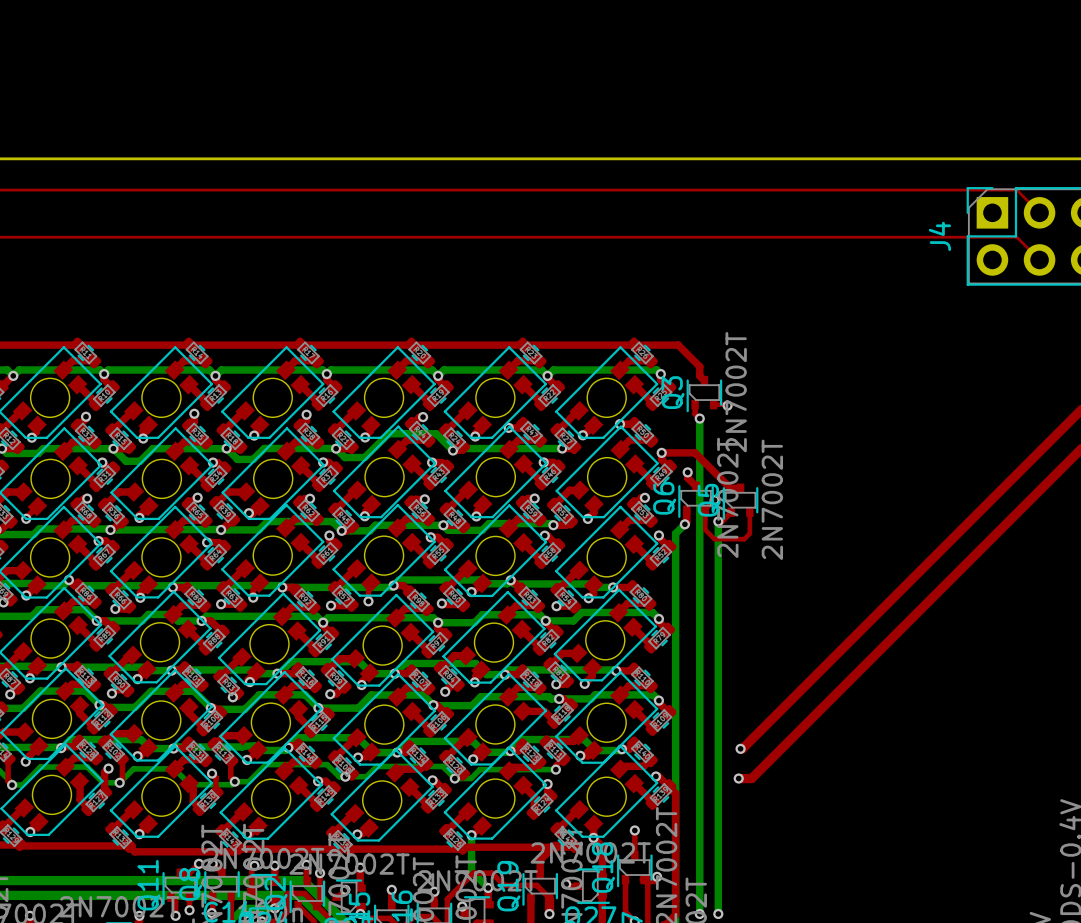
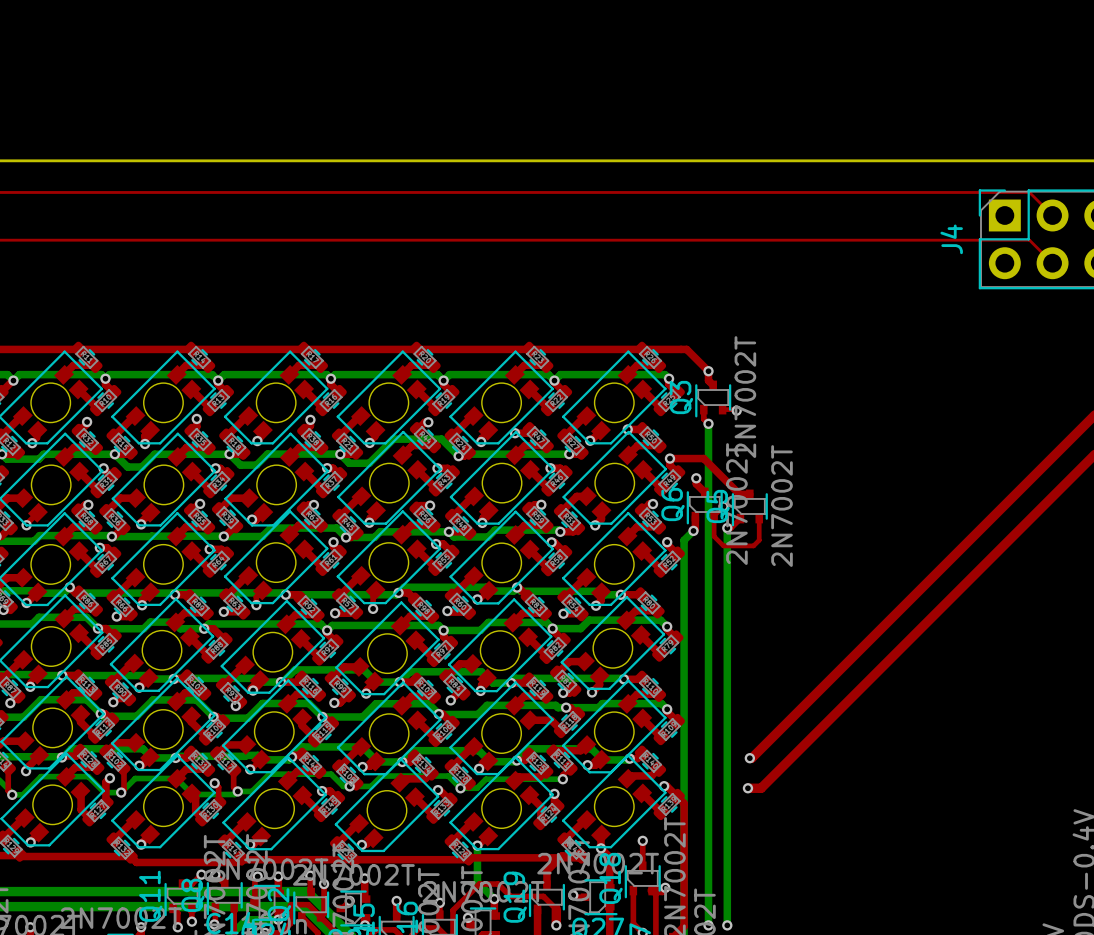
via: none -> (708, 371)

